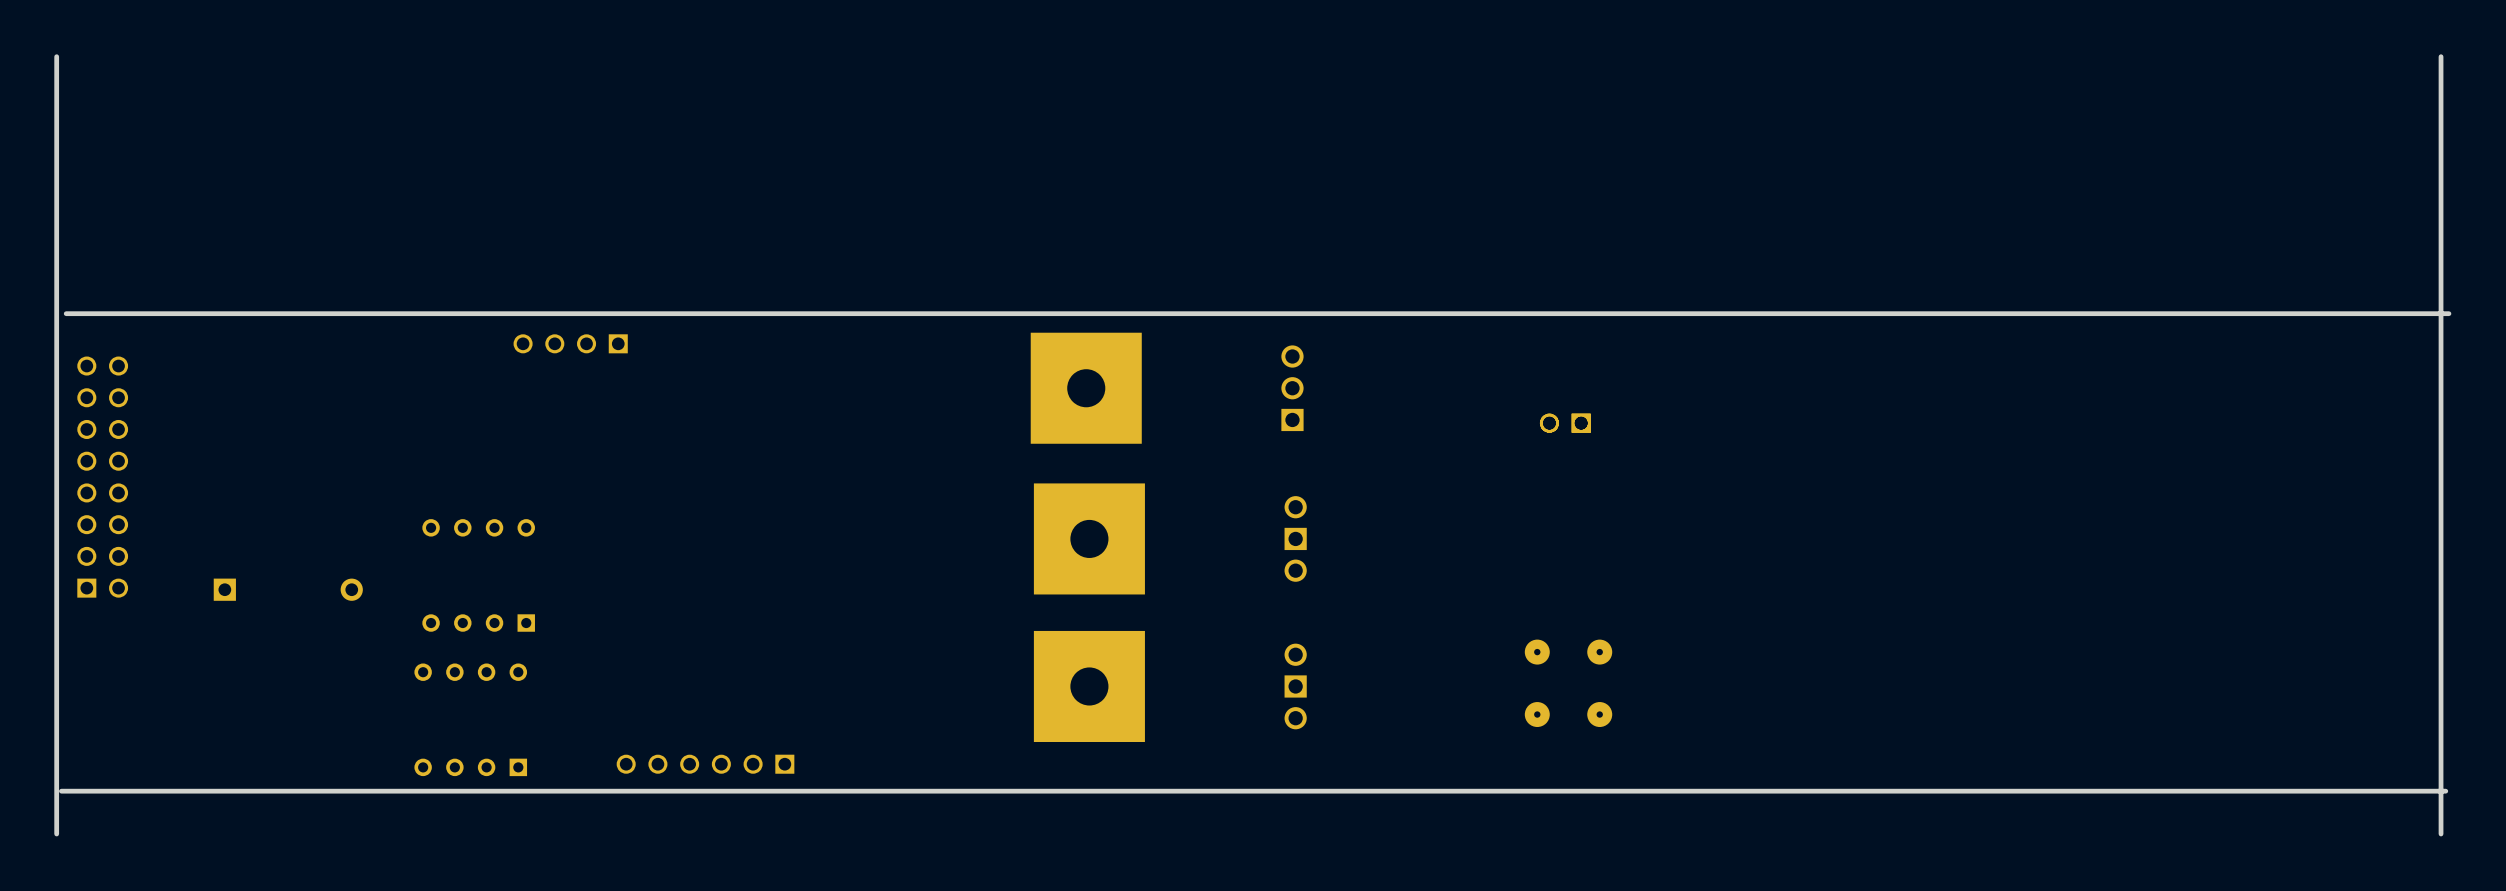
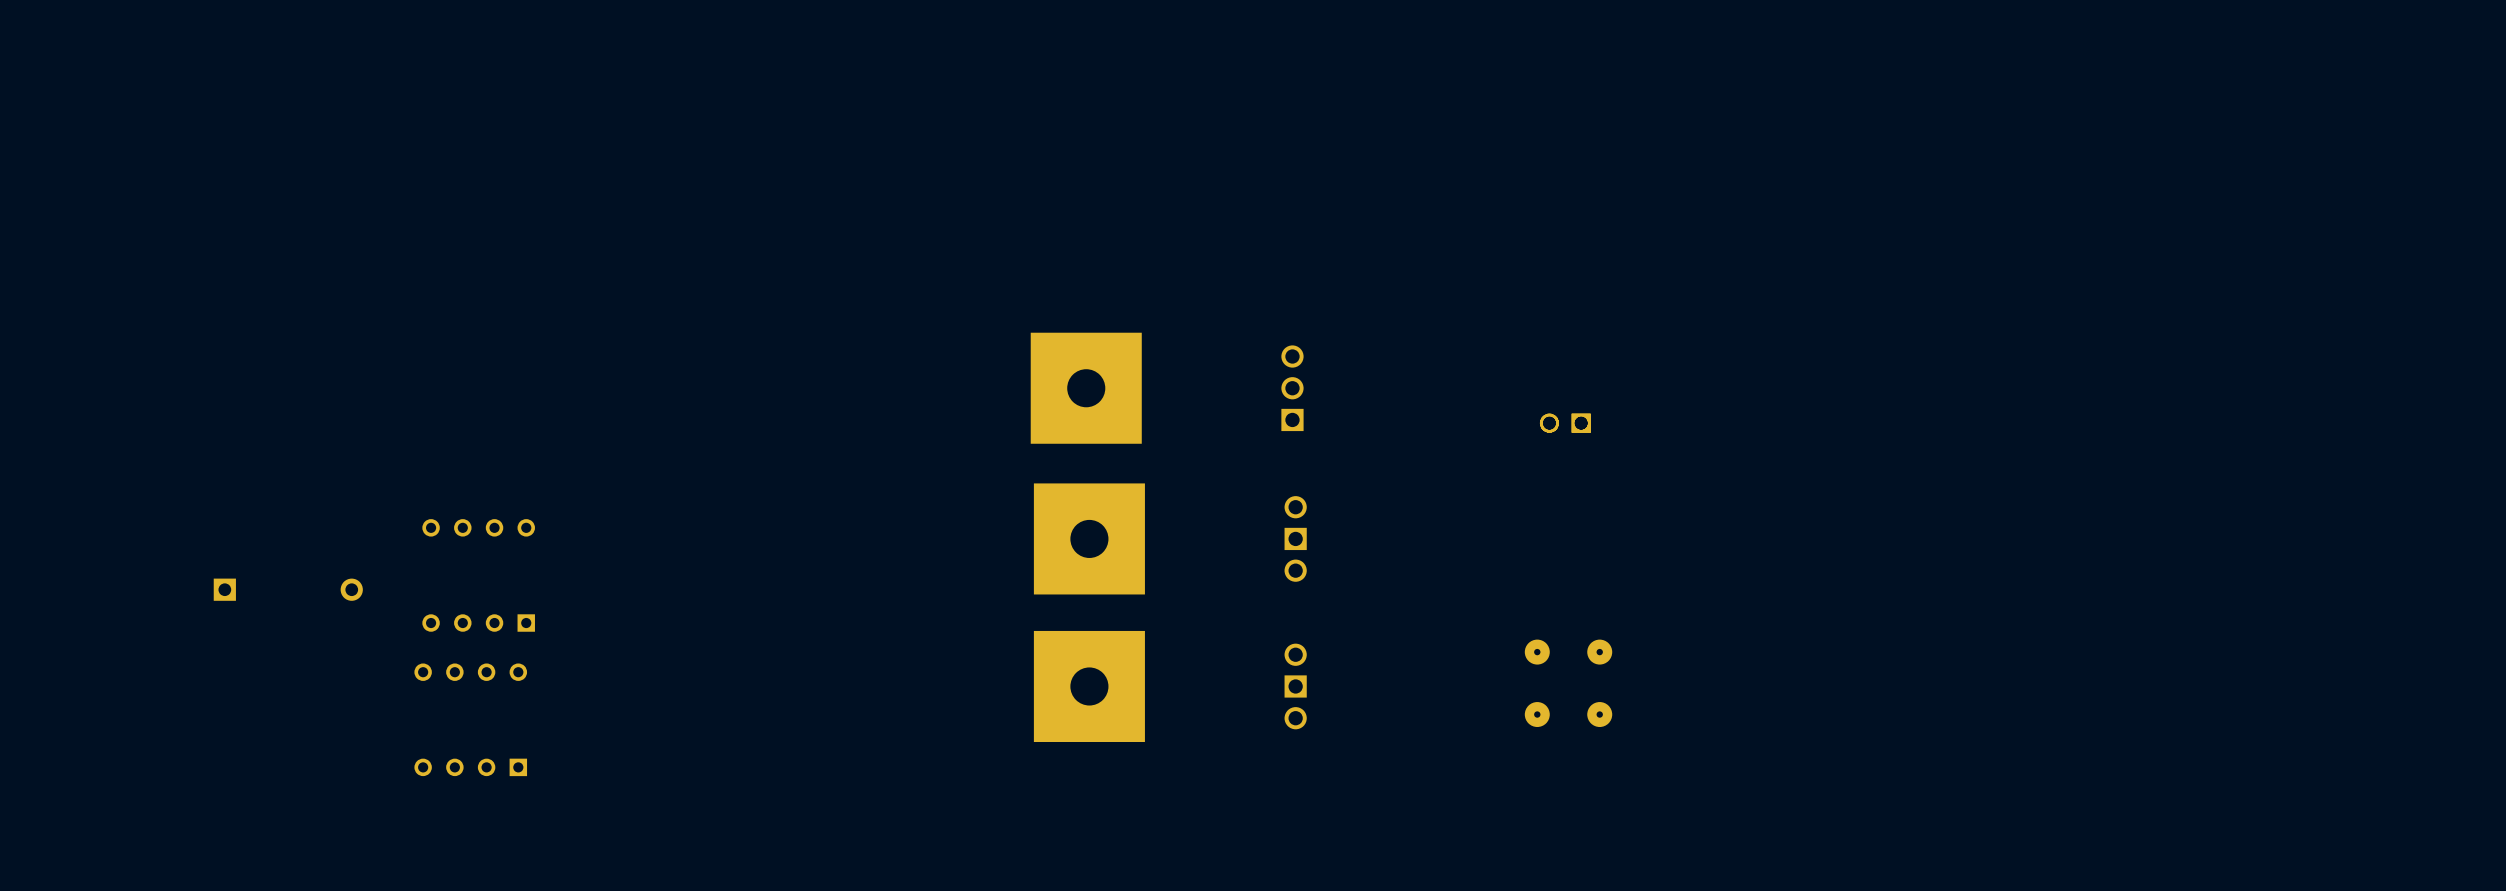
board edge: (56, 56) (56, 834) -> none
board edge: (2441, 56) (2441, 834) -> none
board edge: (2448, 313) (66, 313) -> none
part: (570, 343) -> none
part: (102, 477) -> none
part: (705, 764) -> none
board edge: (2445, 791) (61, 791) -> none

